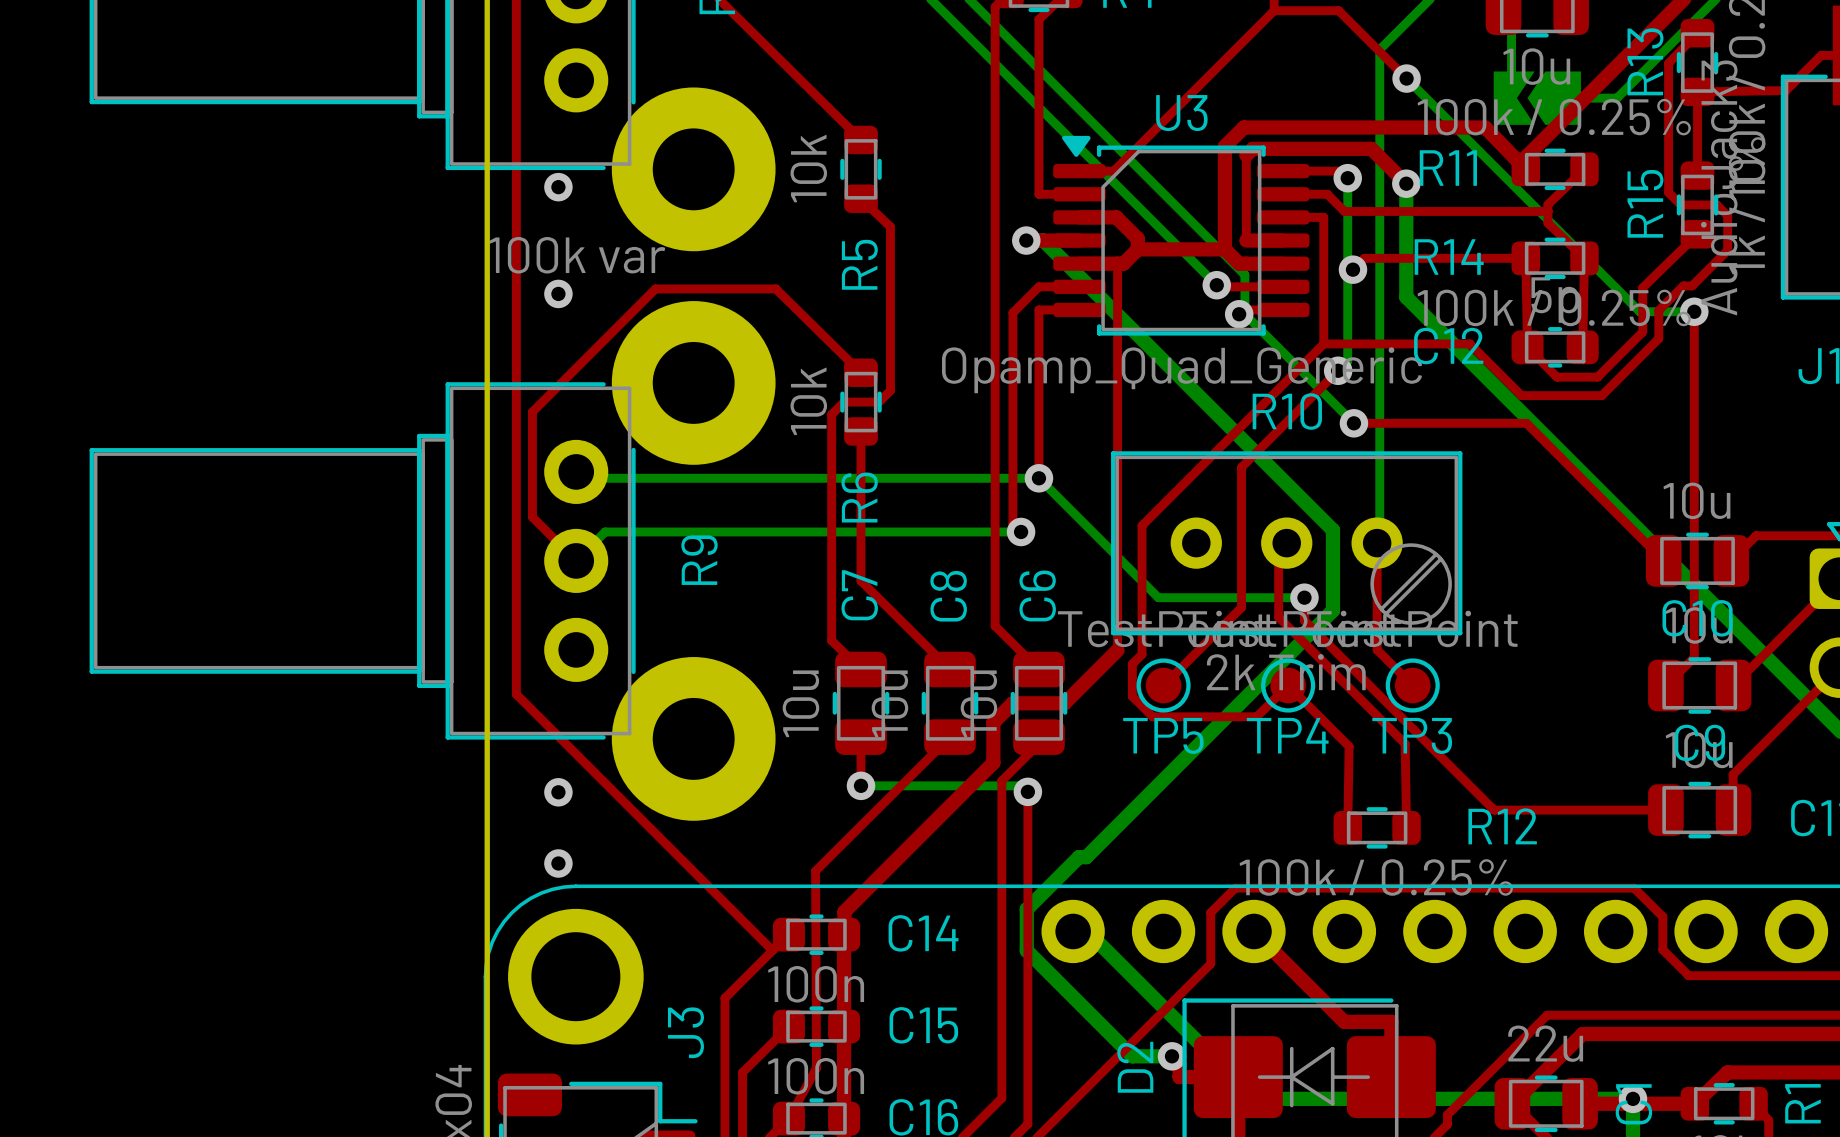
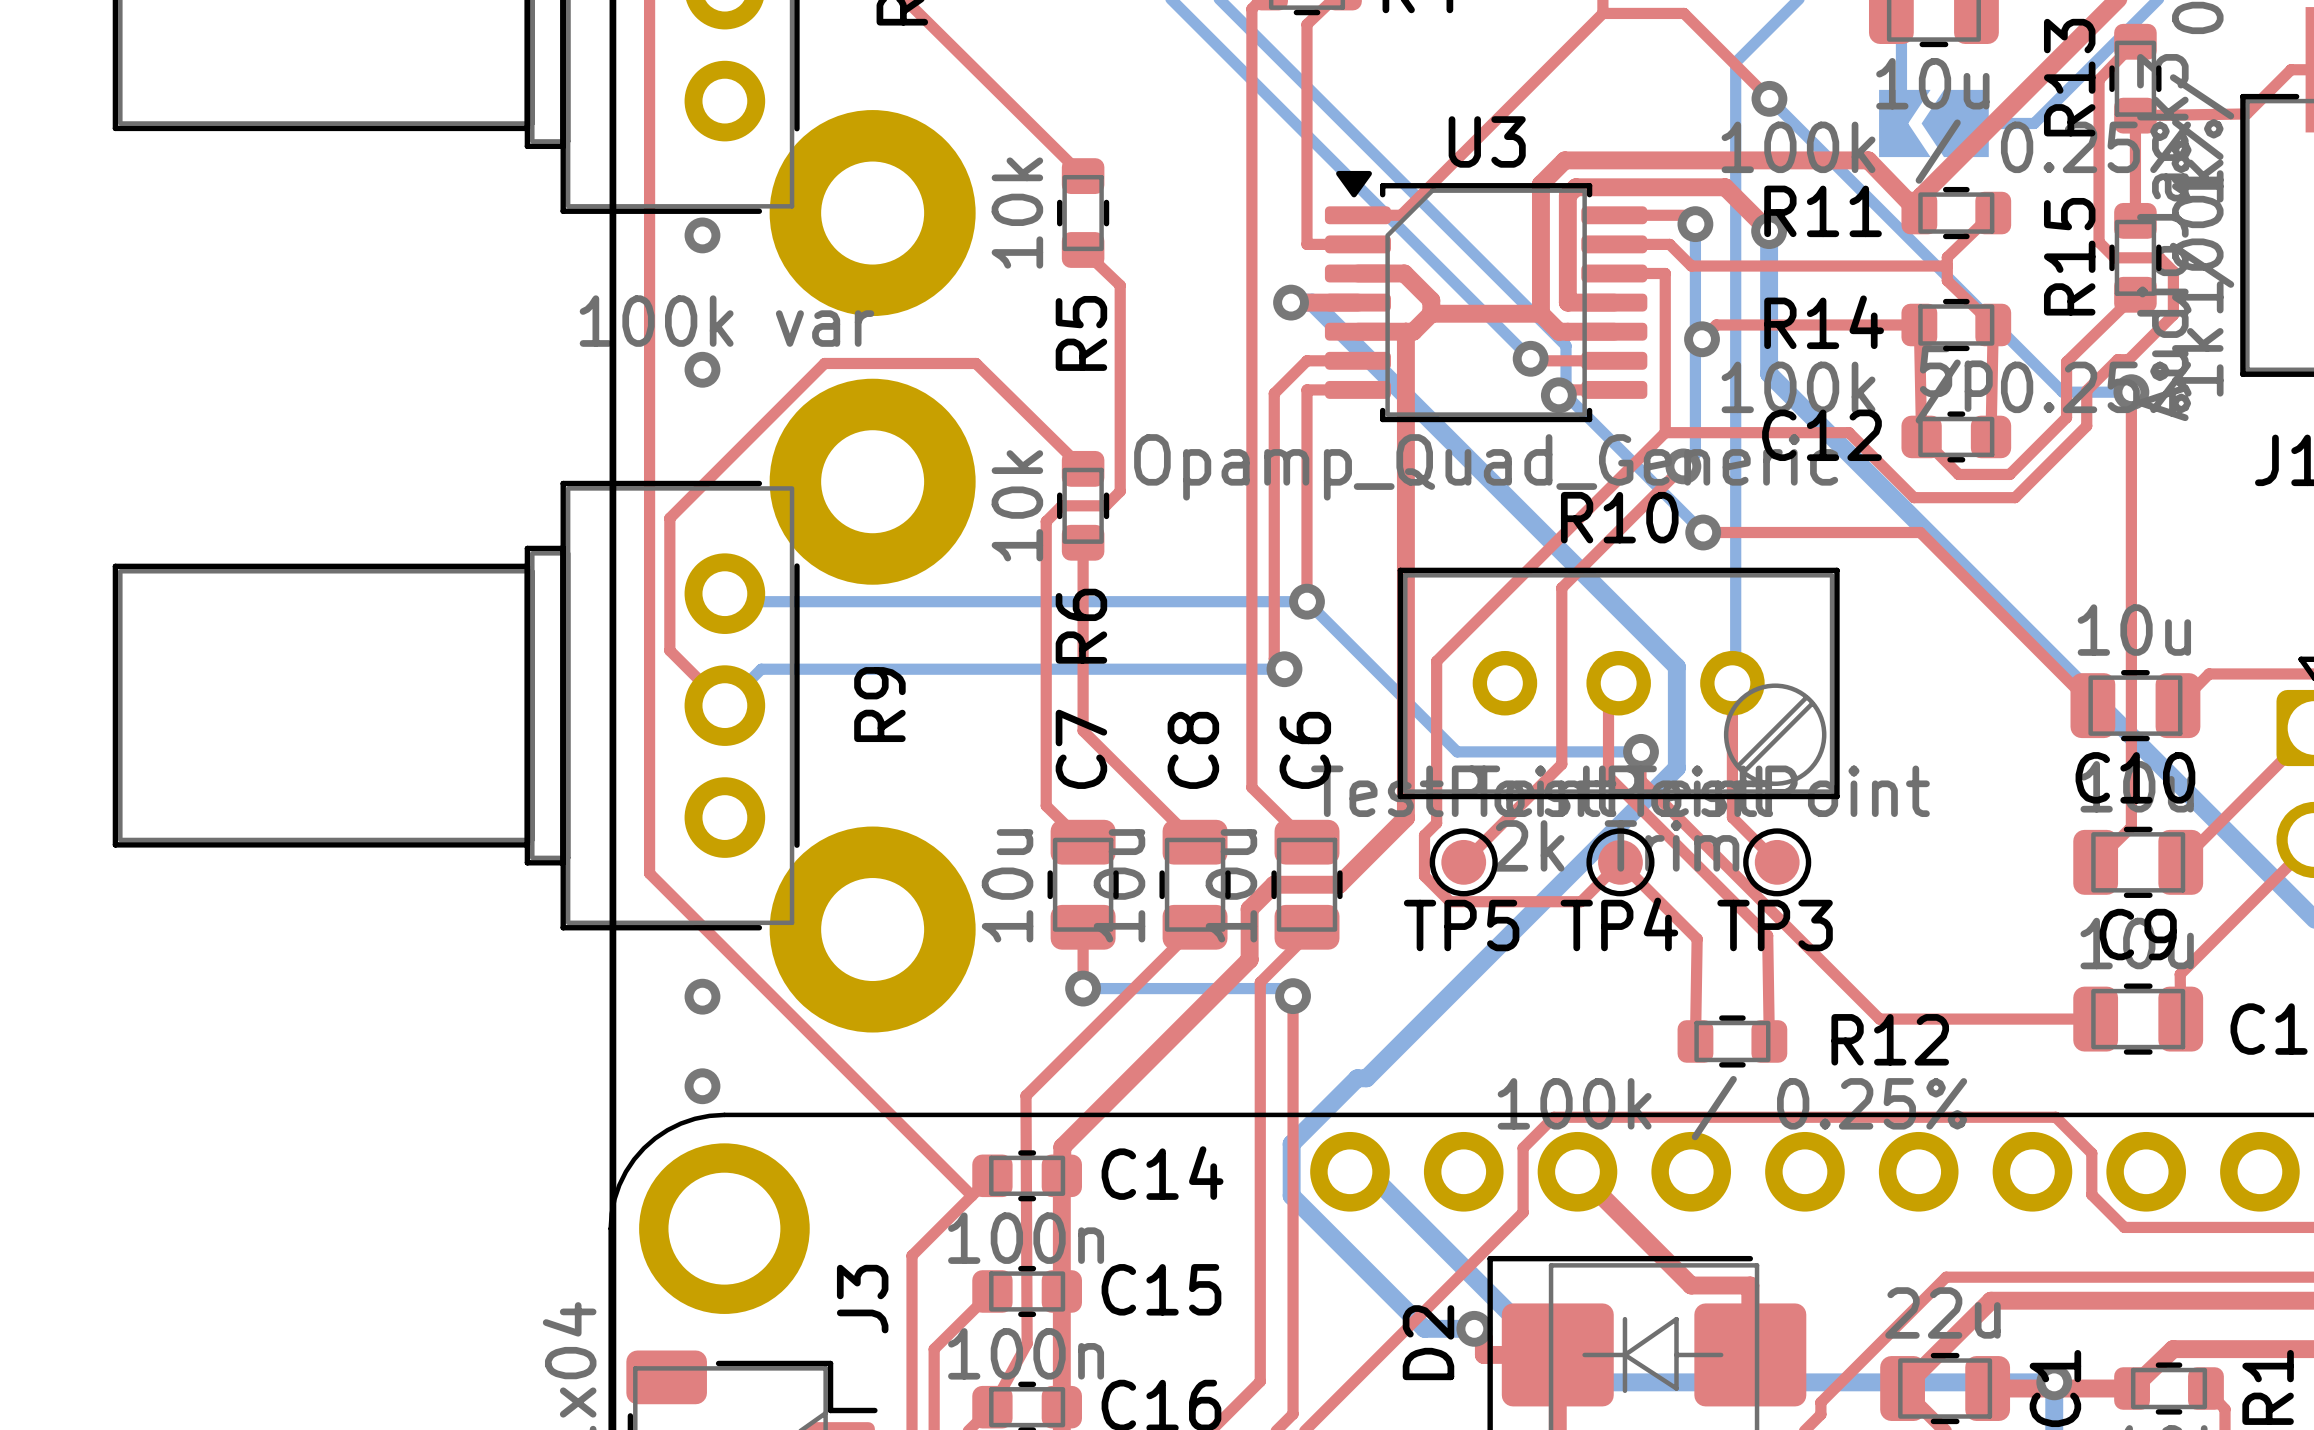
top track width: thin (1246, 155) (1246, 240) -> thick (1567, 195) (1567, 302)
top track width: thin (1117, 263) (1117, 650) -> thick (1405, 331) (1405, 818)

